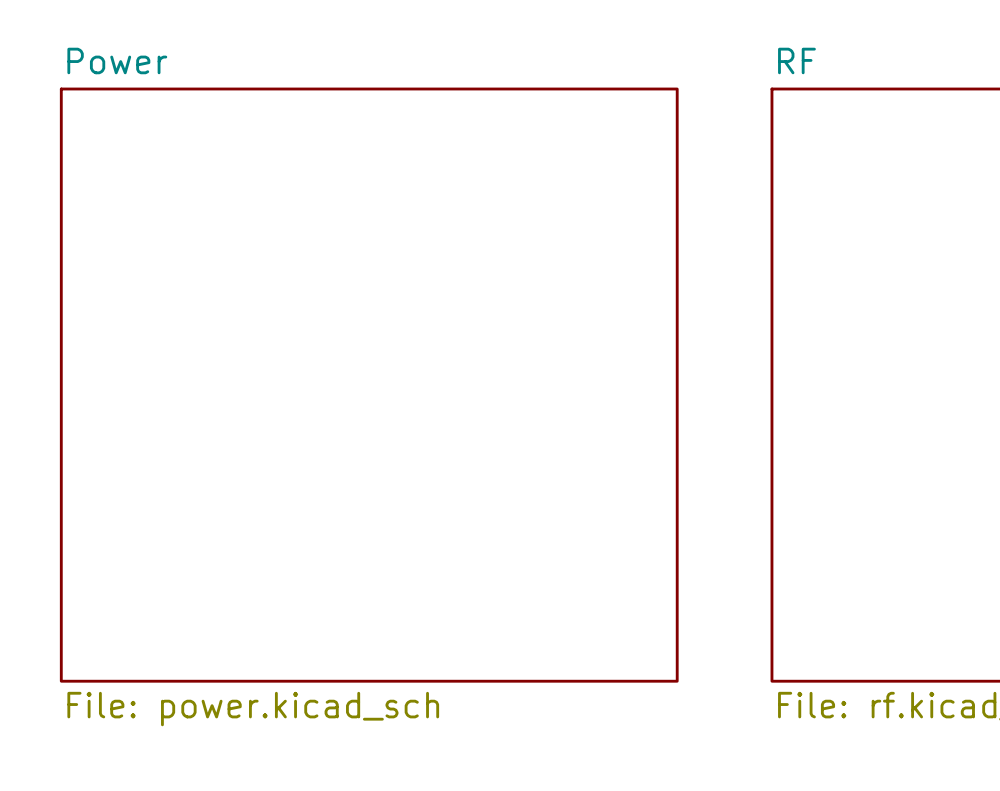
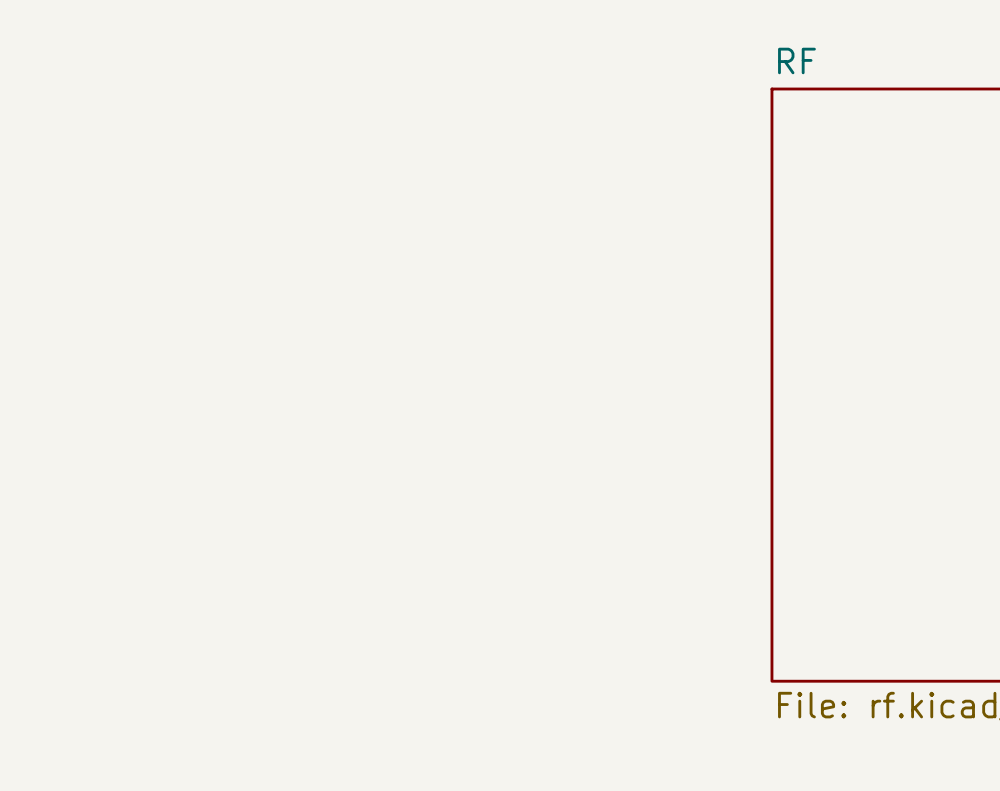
sheet Power: File: power.kicad_sch (369, 385) -> none

